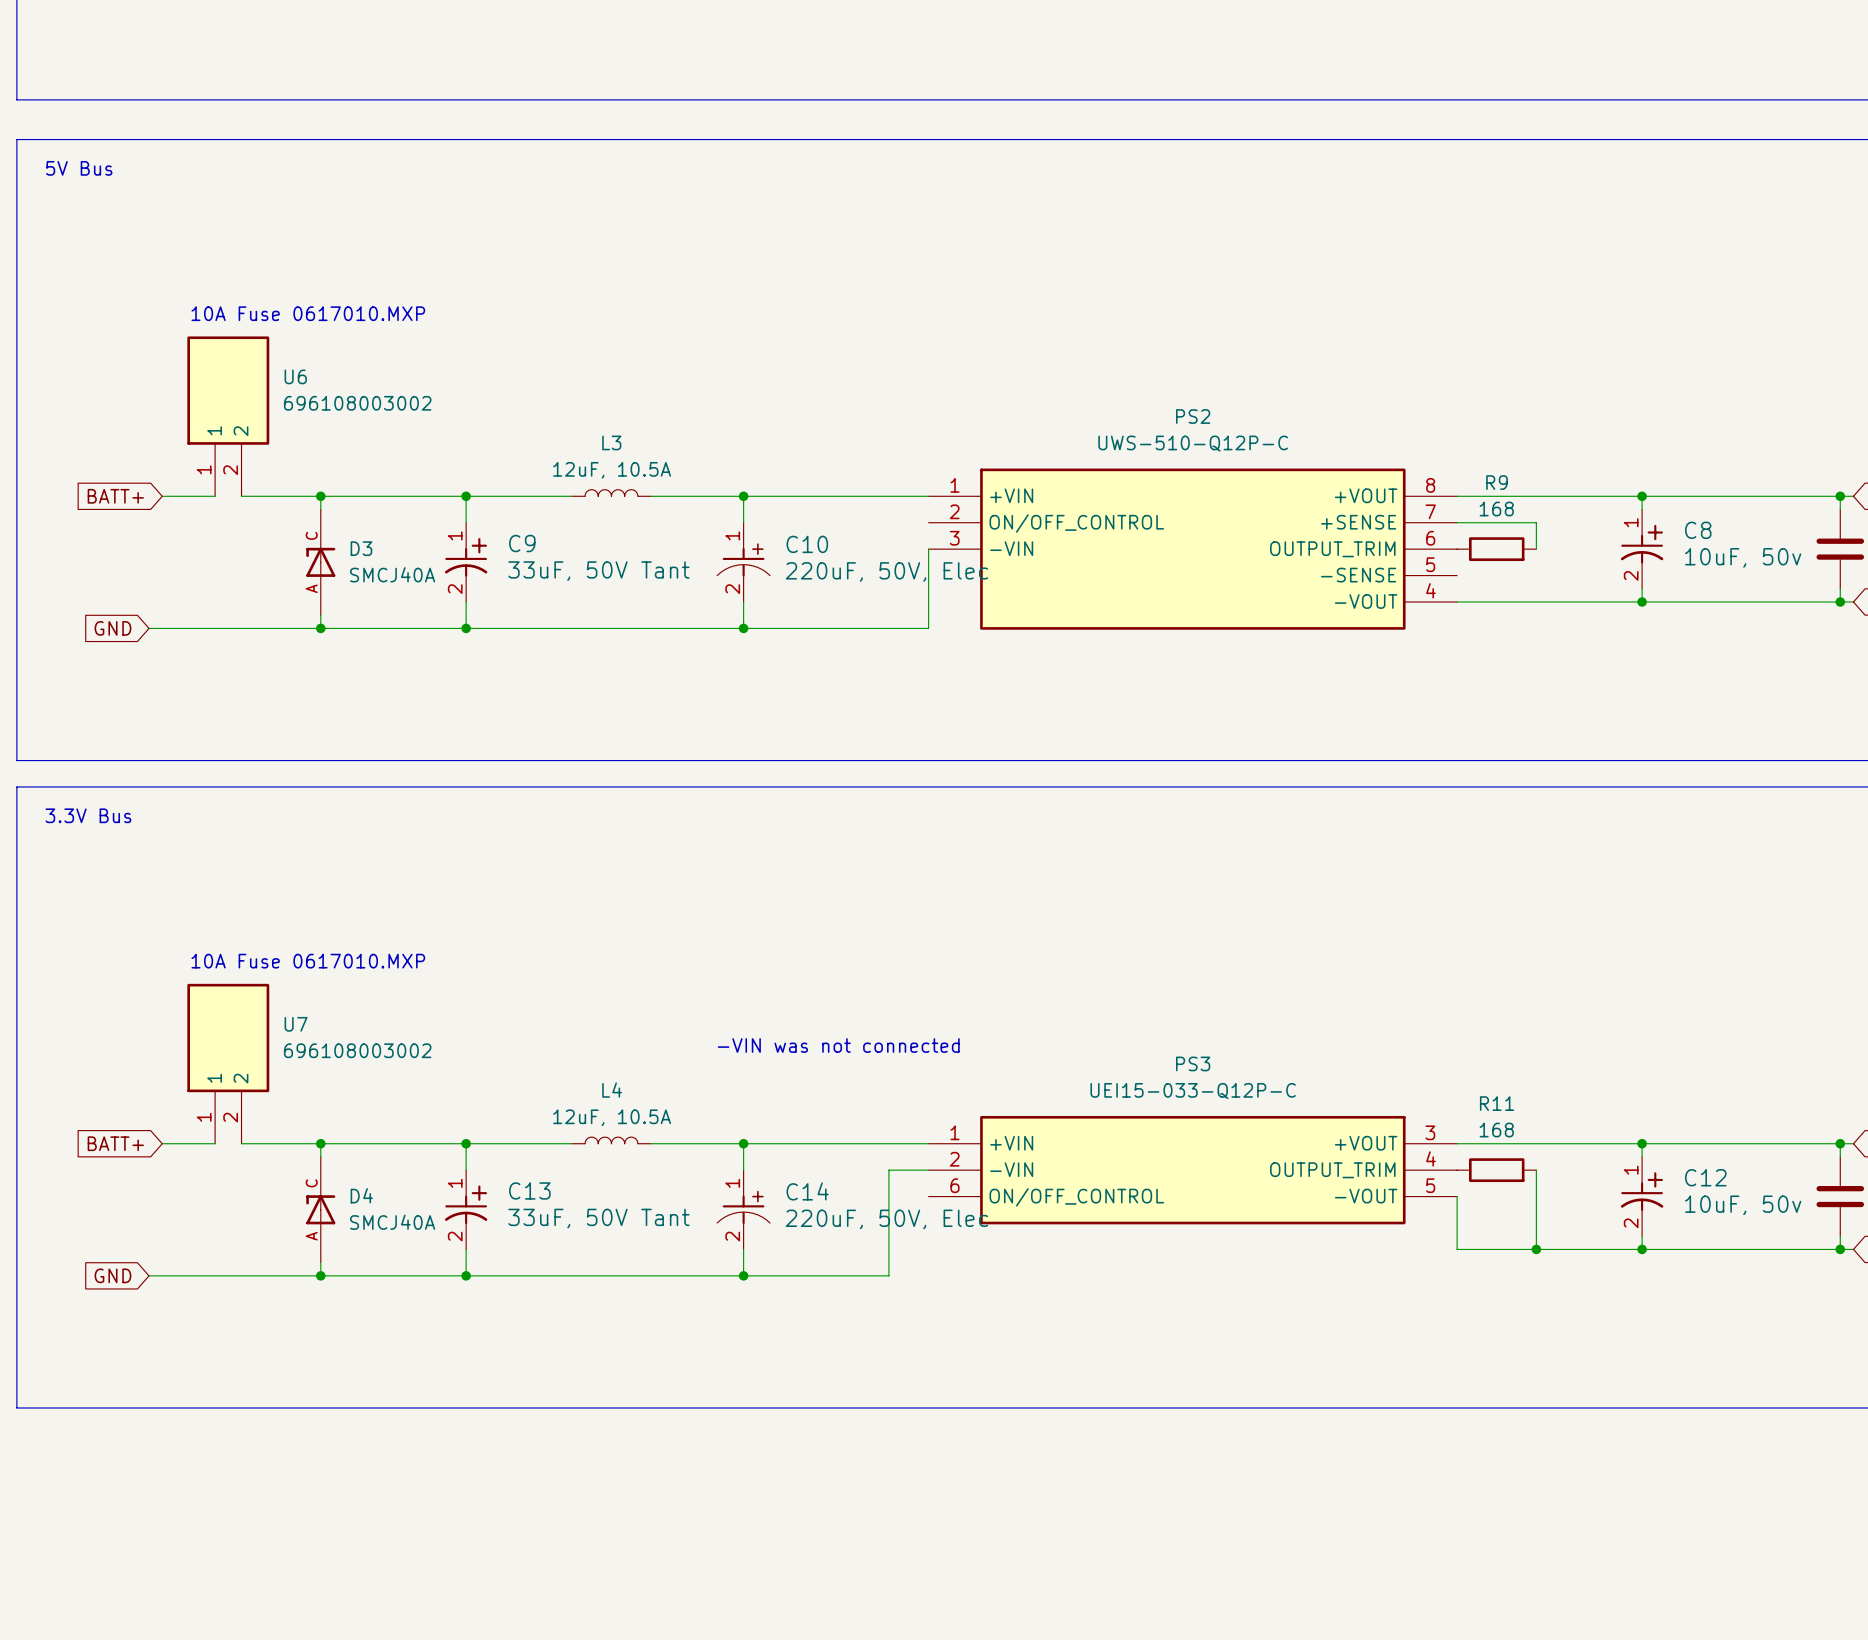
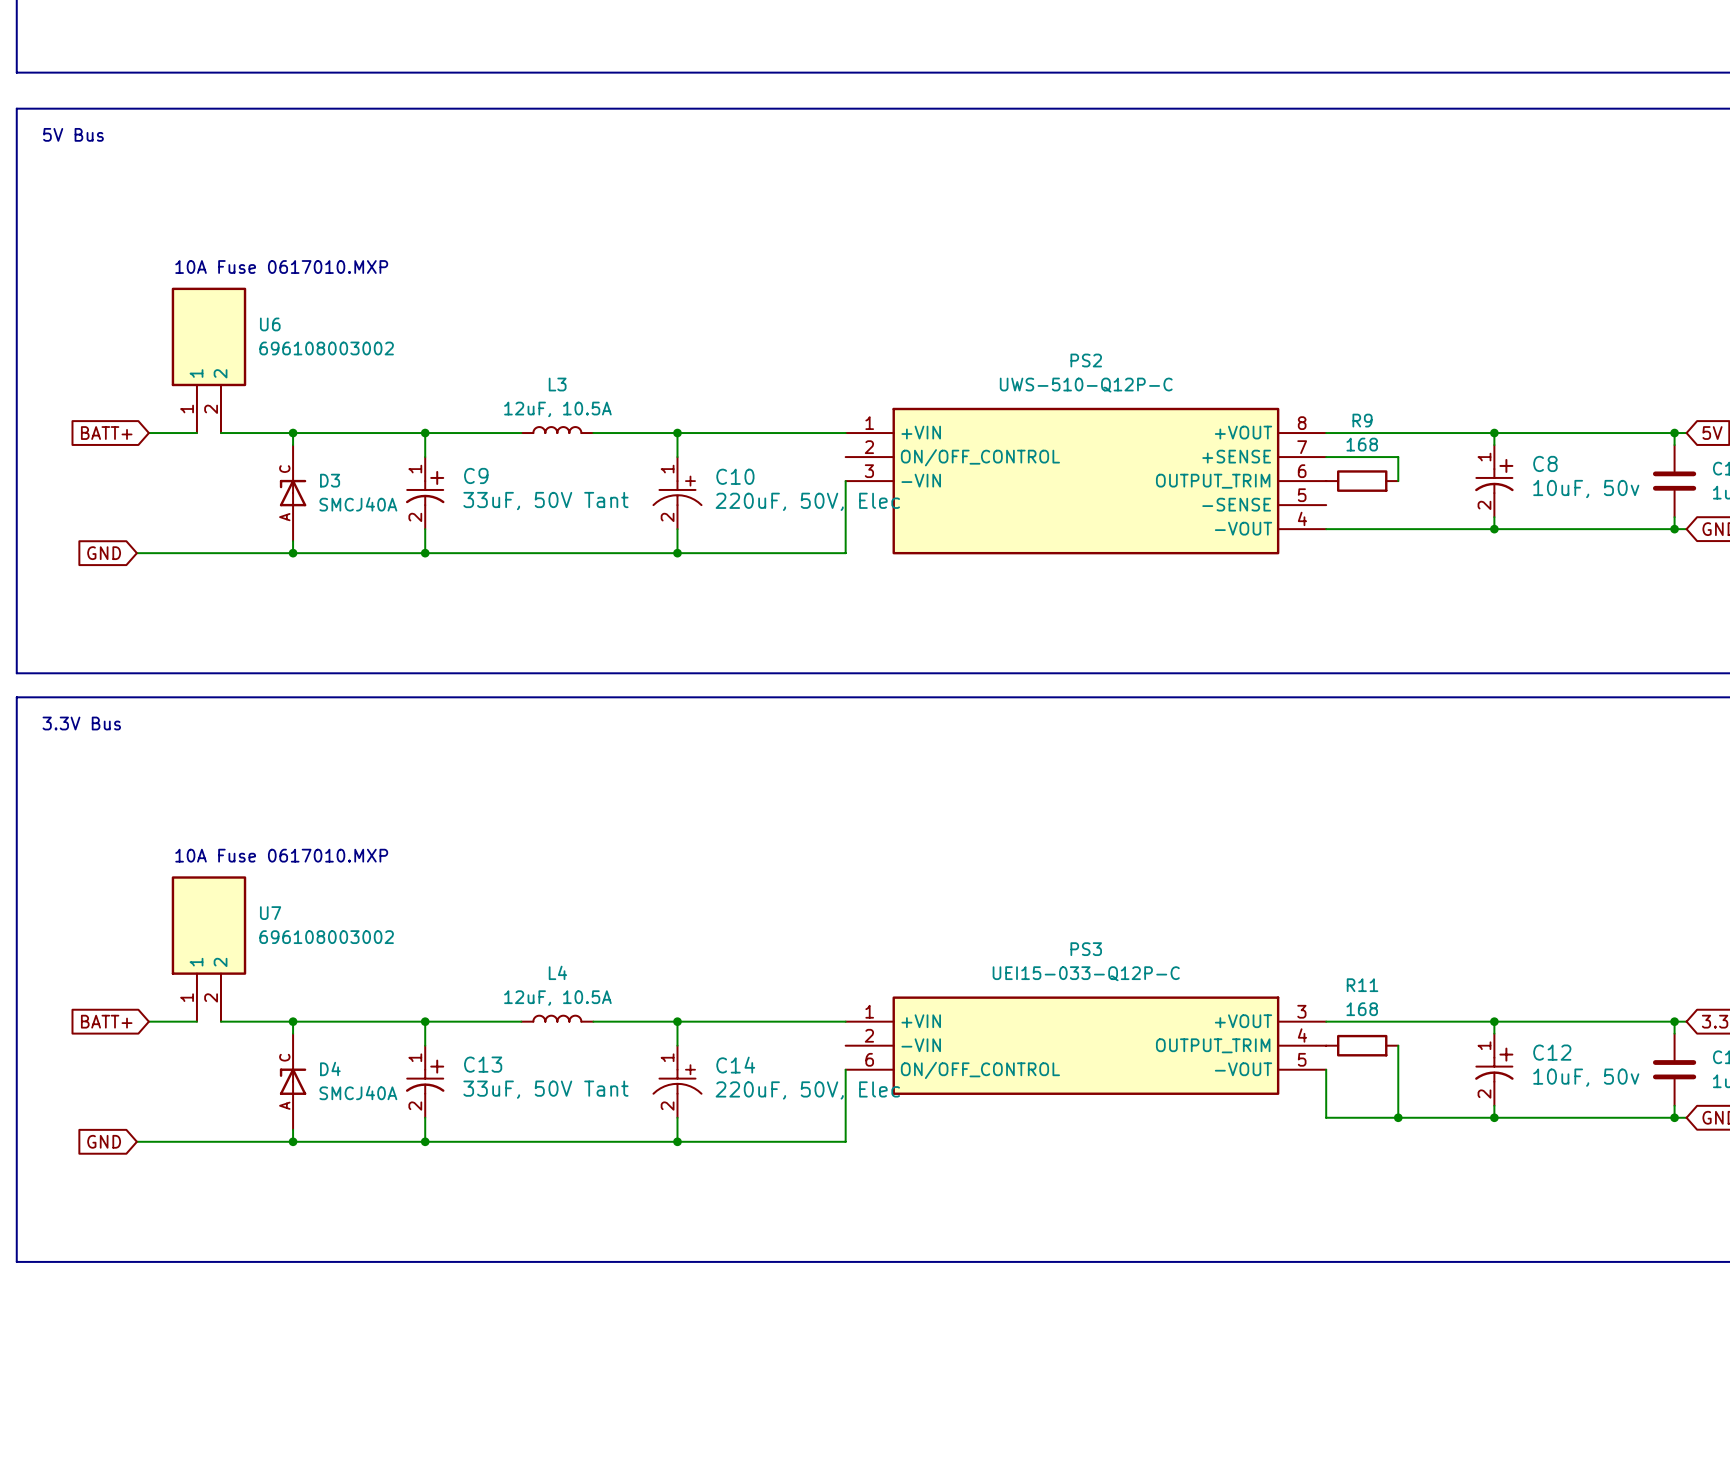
text: -VIN was not connected (838, 1045) -> none
wire: (928, 1170) (888, 1170) (888, 1275) -> (845, 1069) (845, 1141) (809, 1141)

